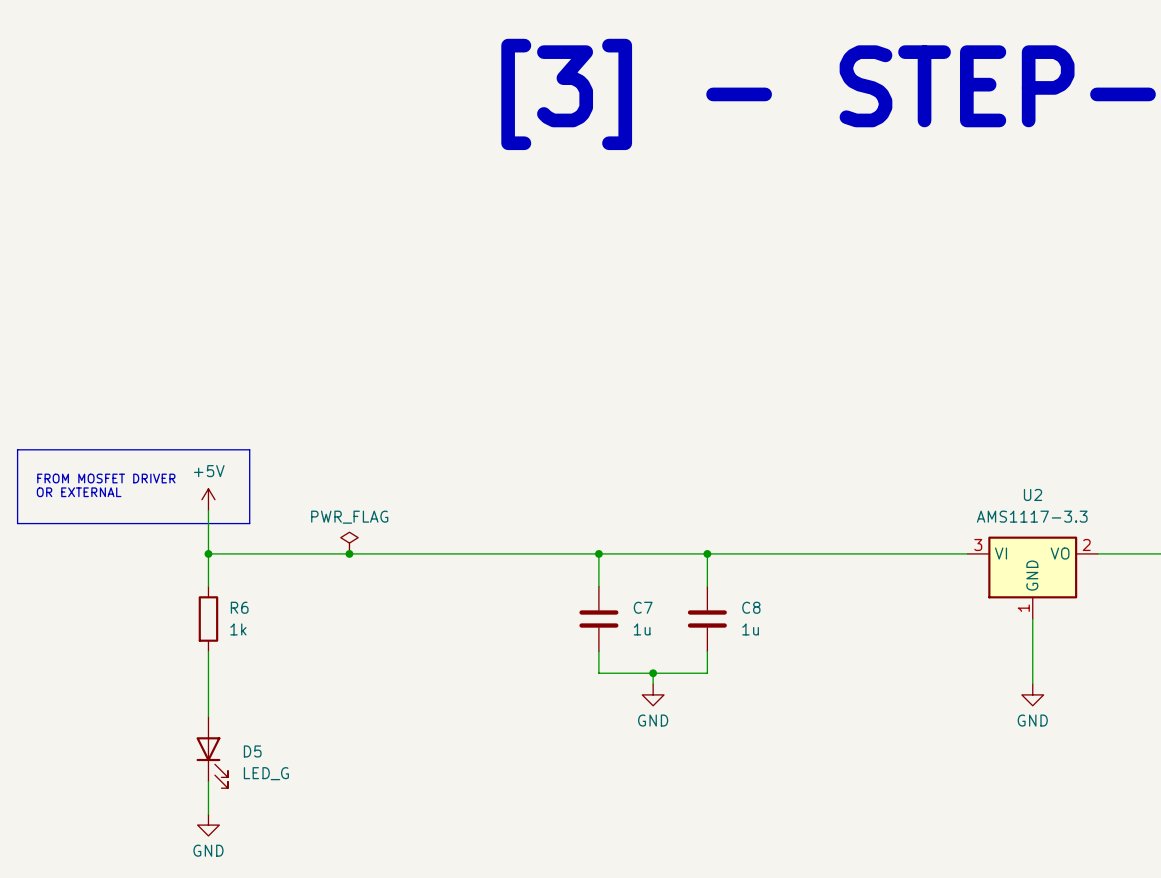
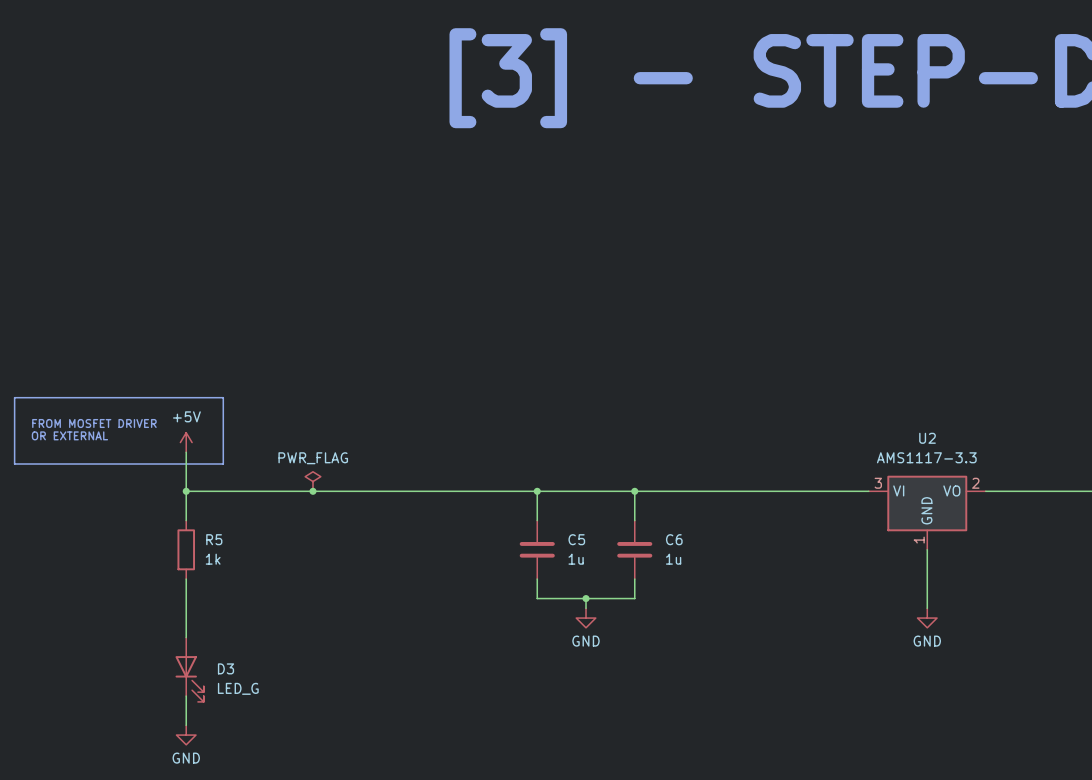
R6 name: R6 (239, 607) -> R5 (214, 539)
C7 name: C7 (643, 607) -> C5 (576, 539)
C8 name: C8 (751, 607) -> C6 (674, 539)
D5 name: D5 (252, 751) -> D3 (226, 668)

